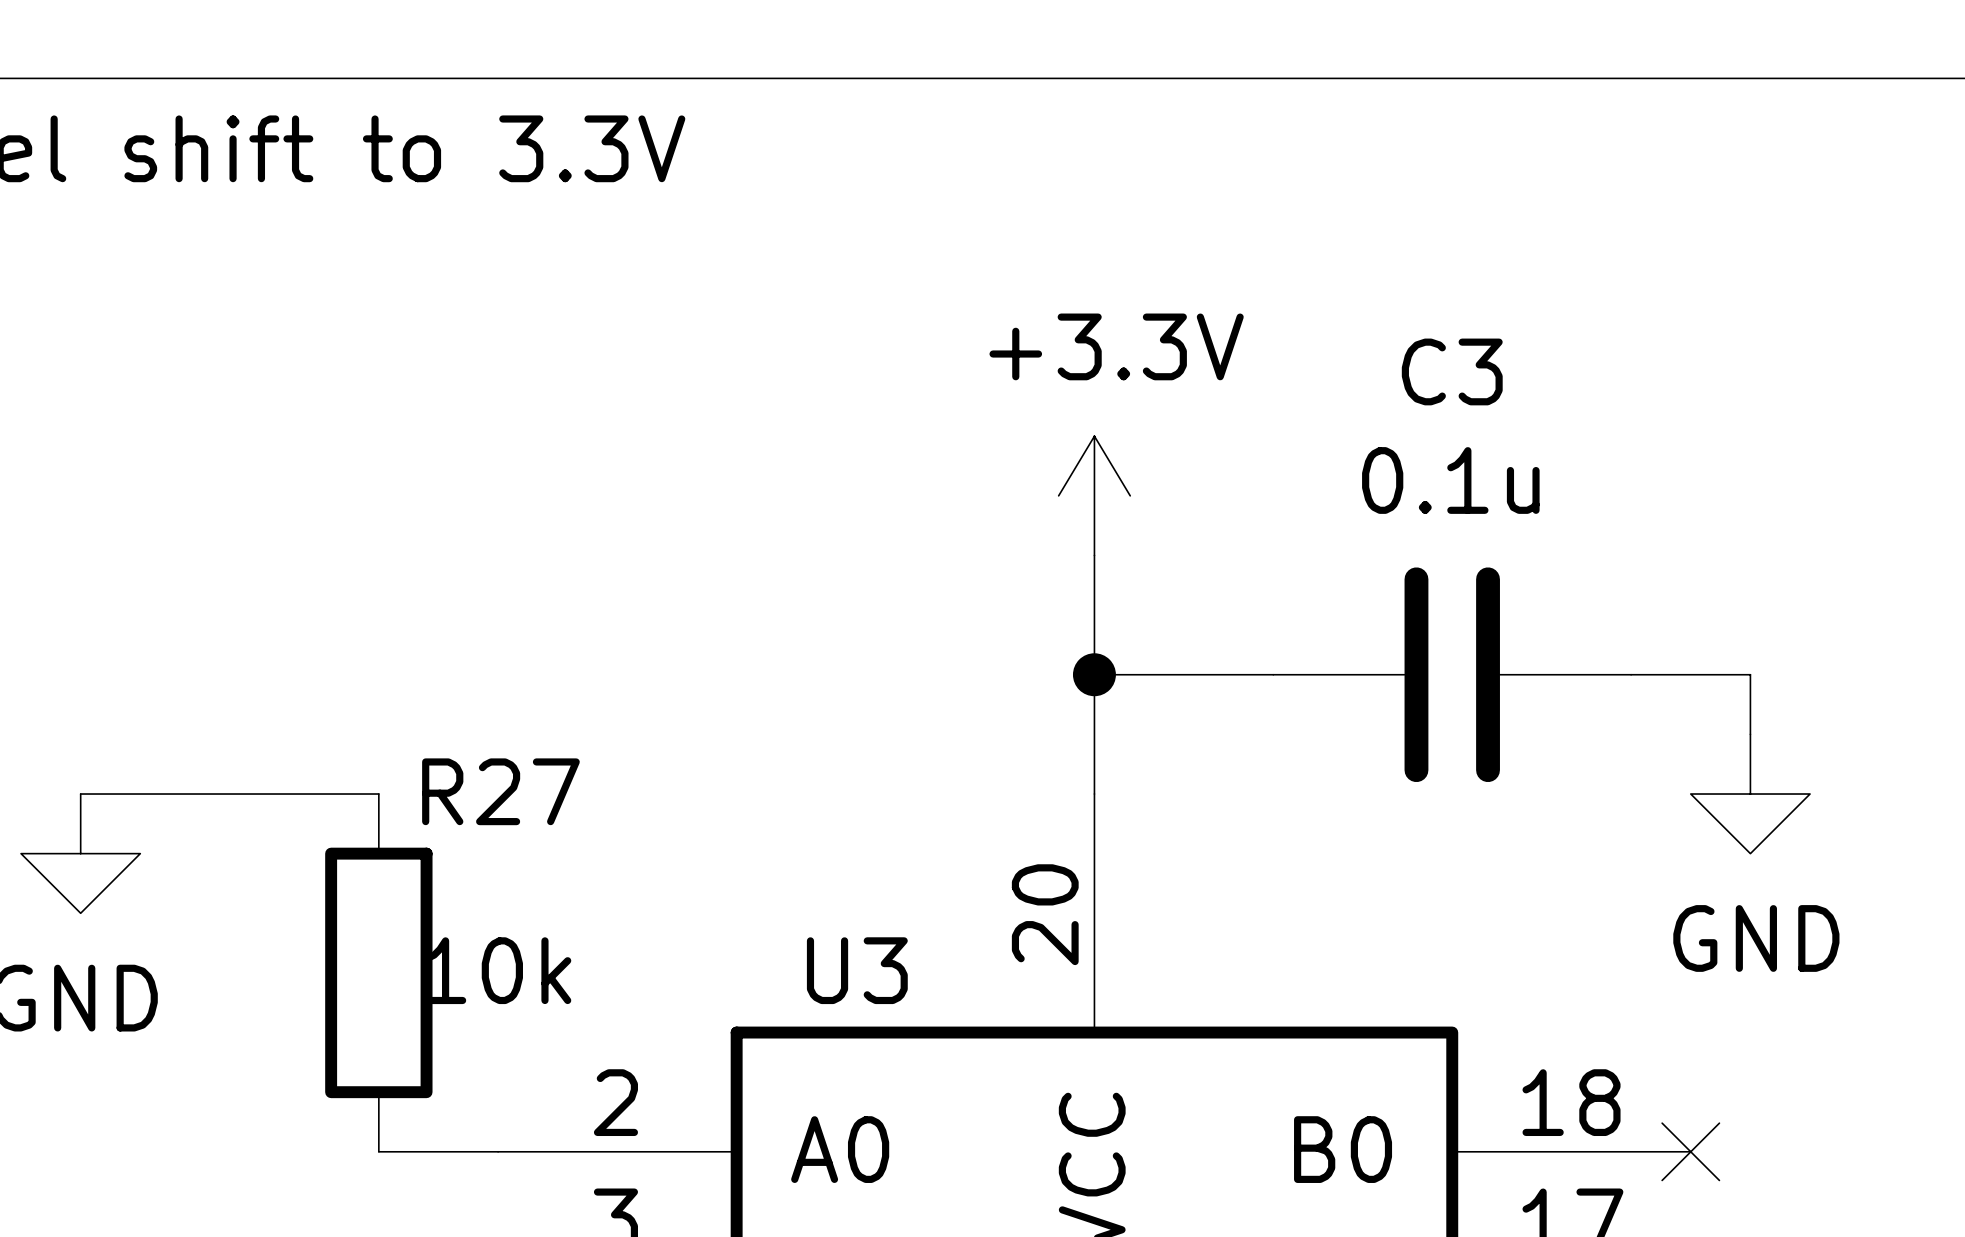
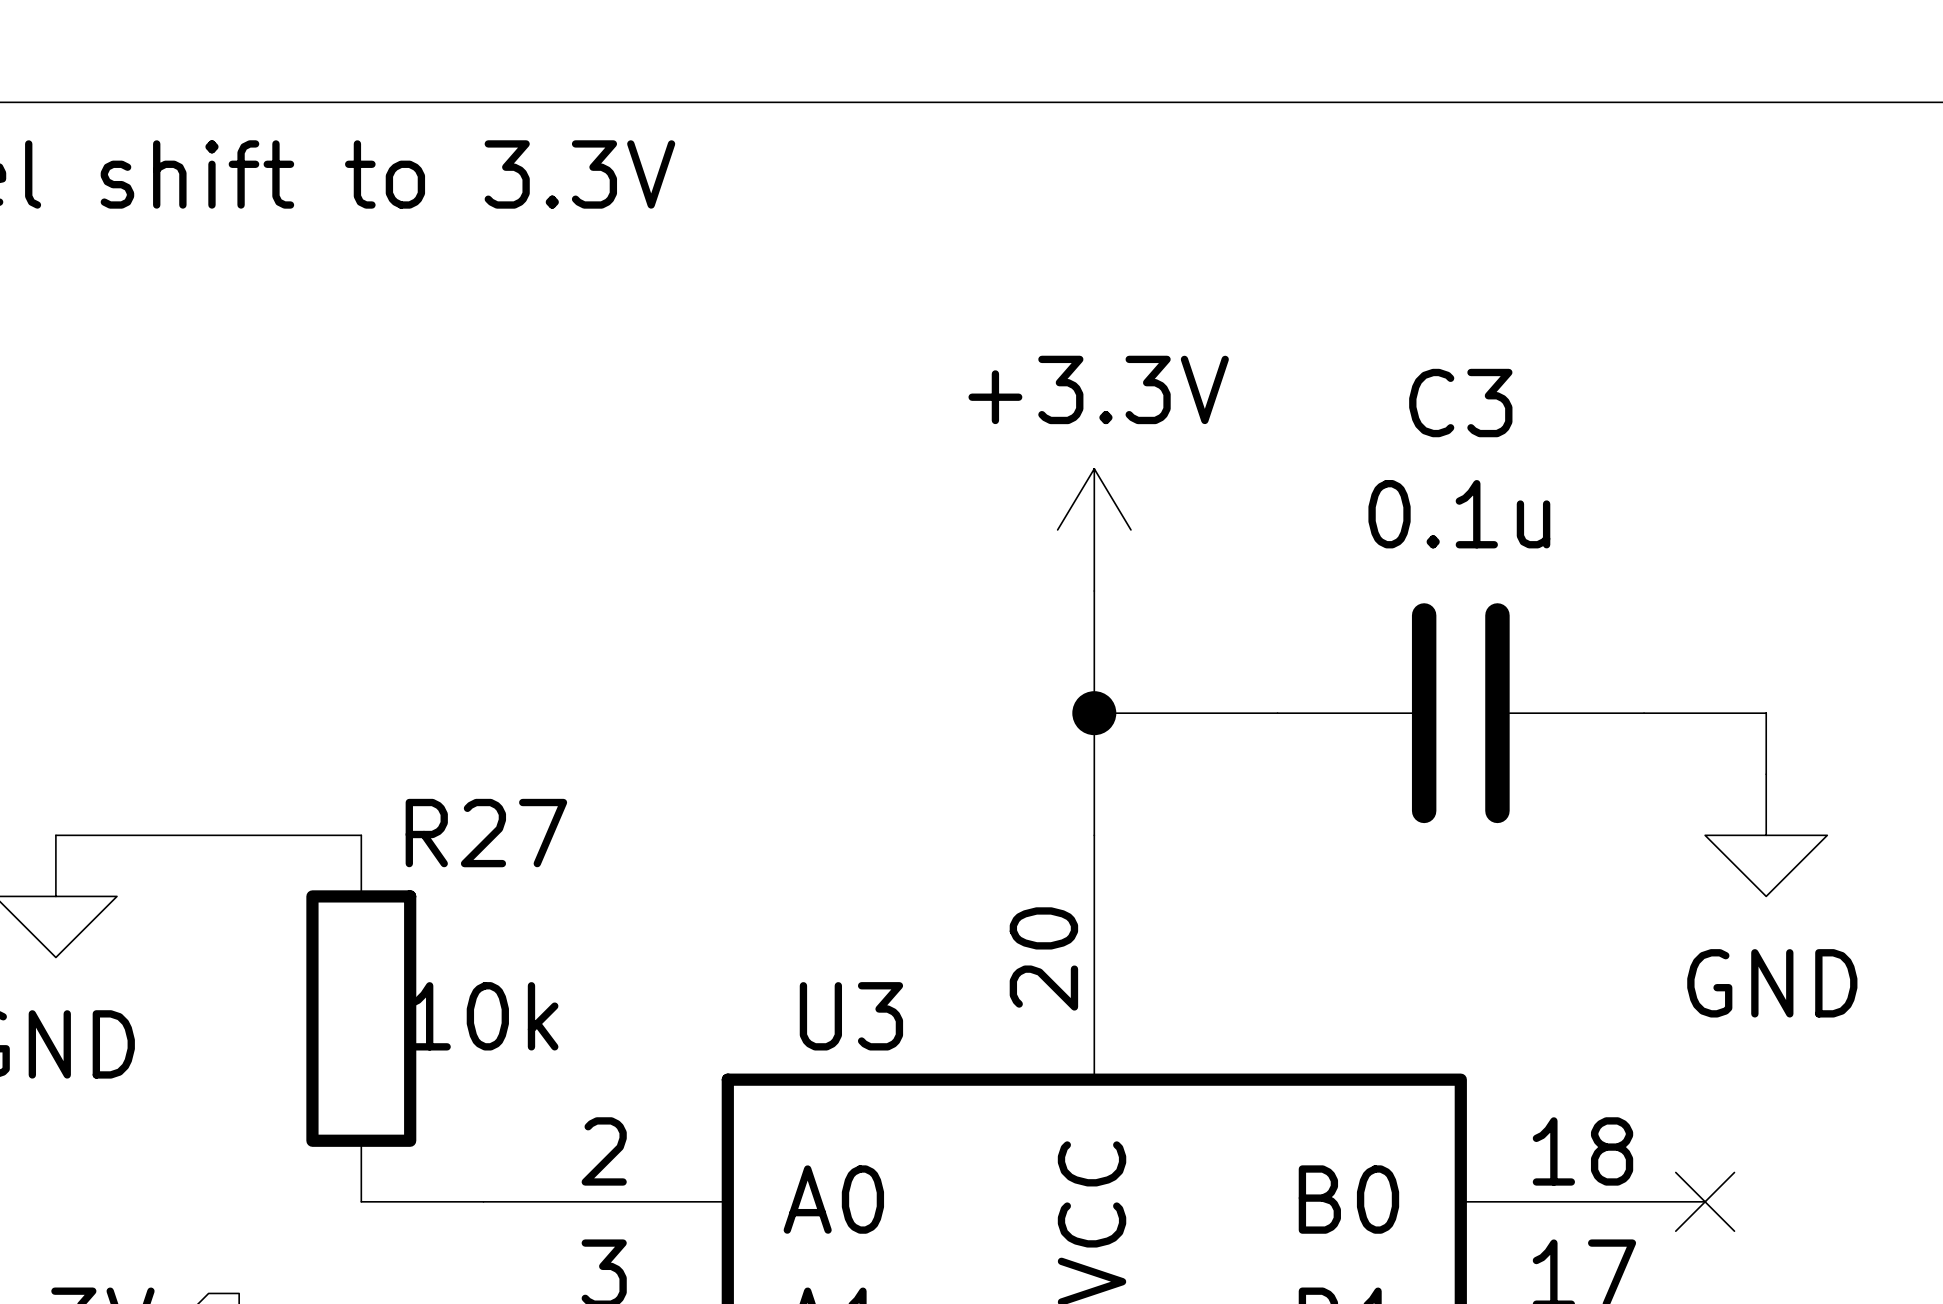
power symbol text position: +3.3V (1116, 346) -> +3.3V (1098, 389)

